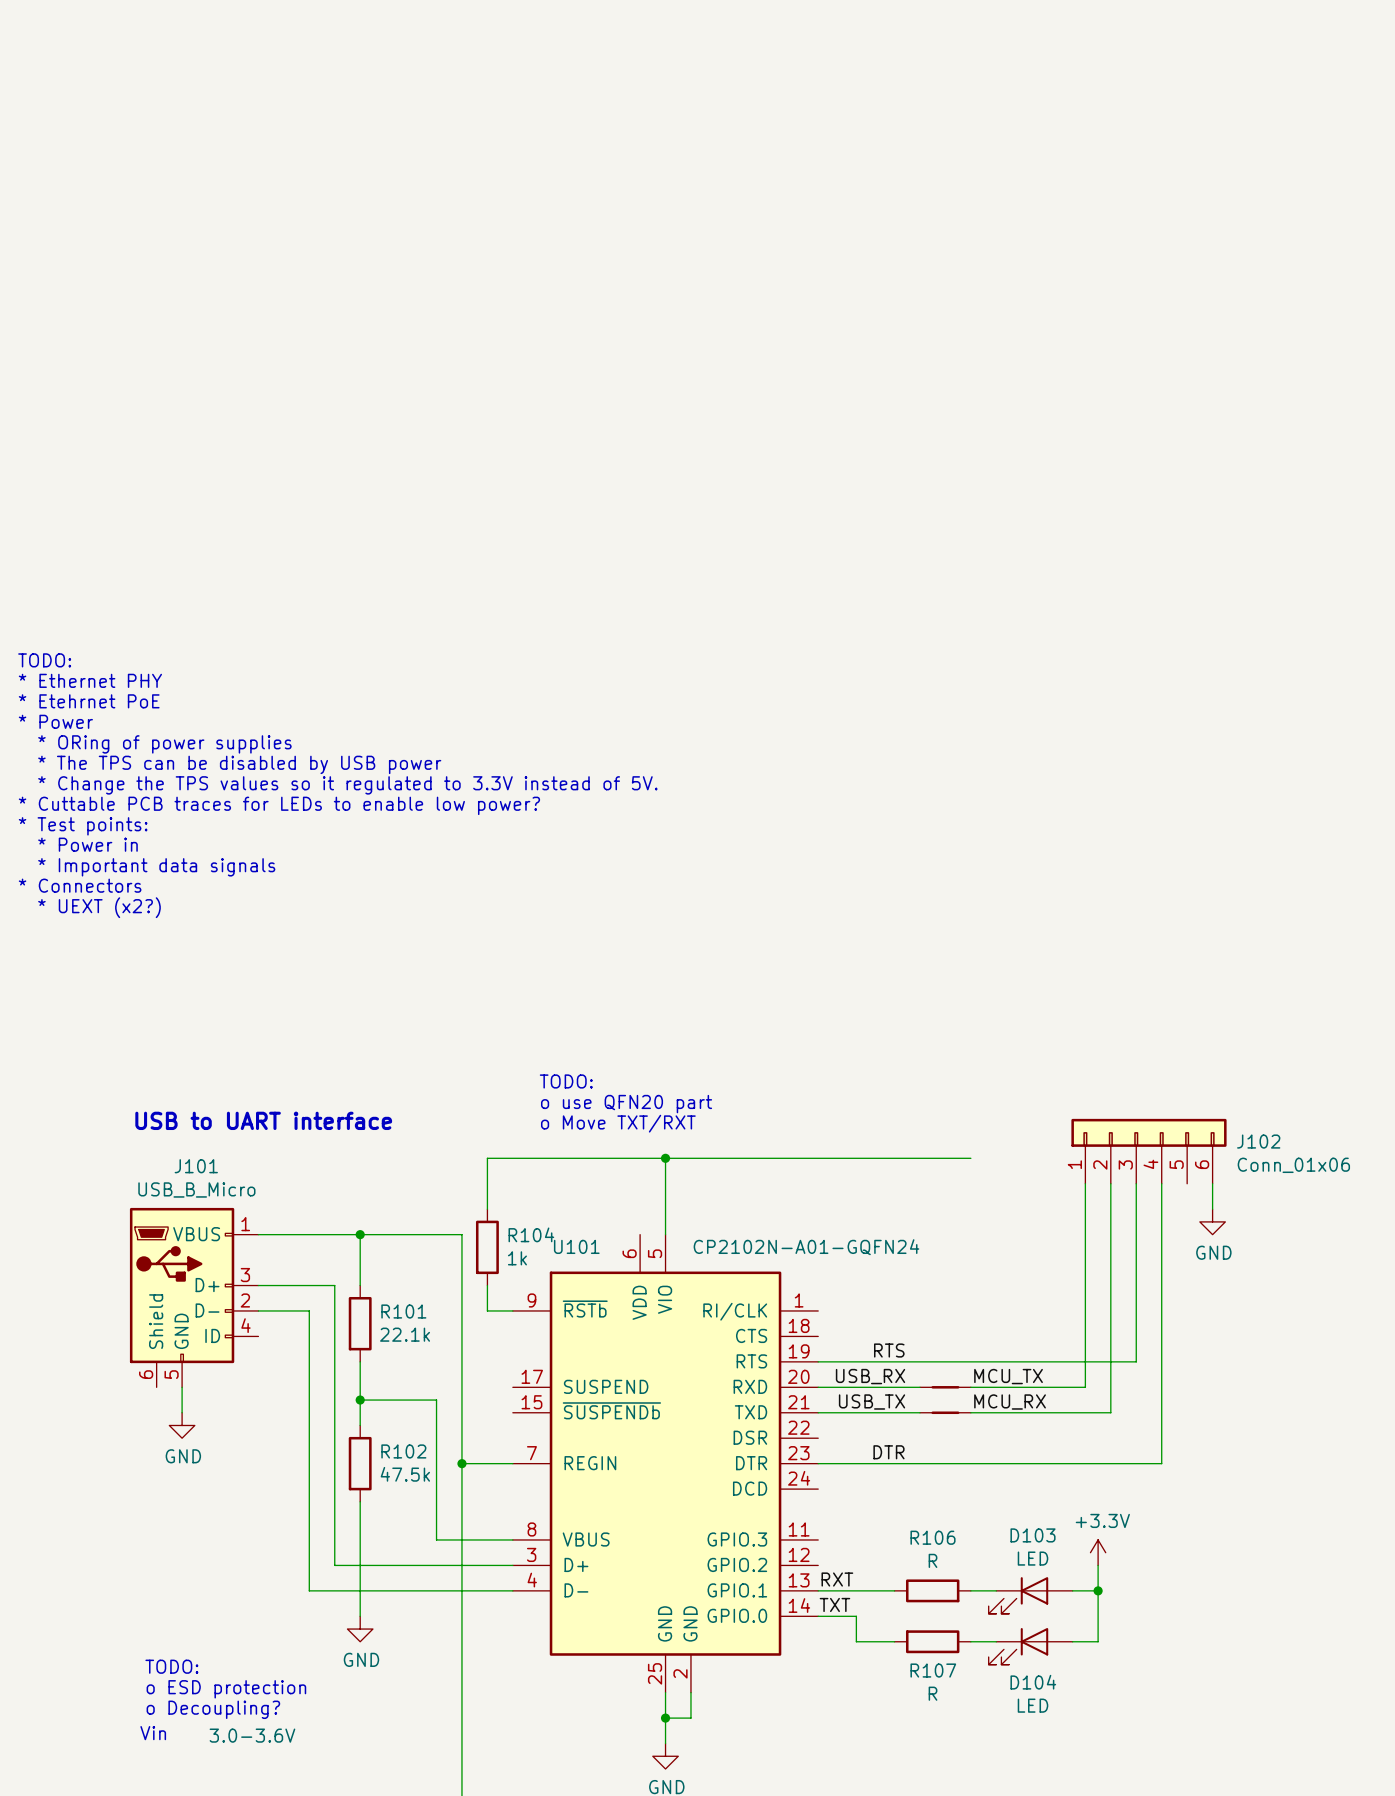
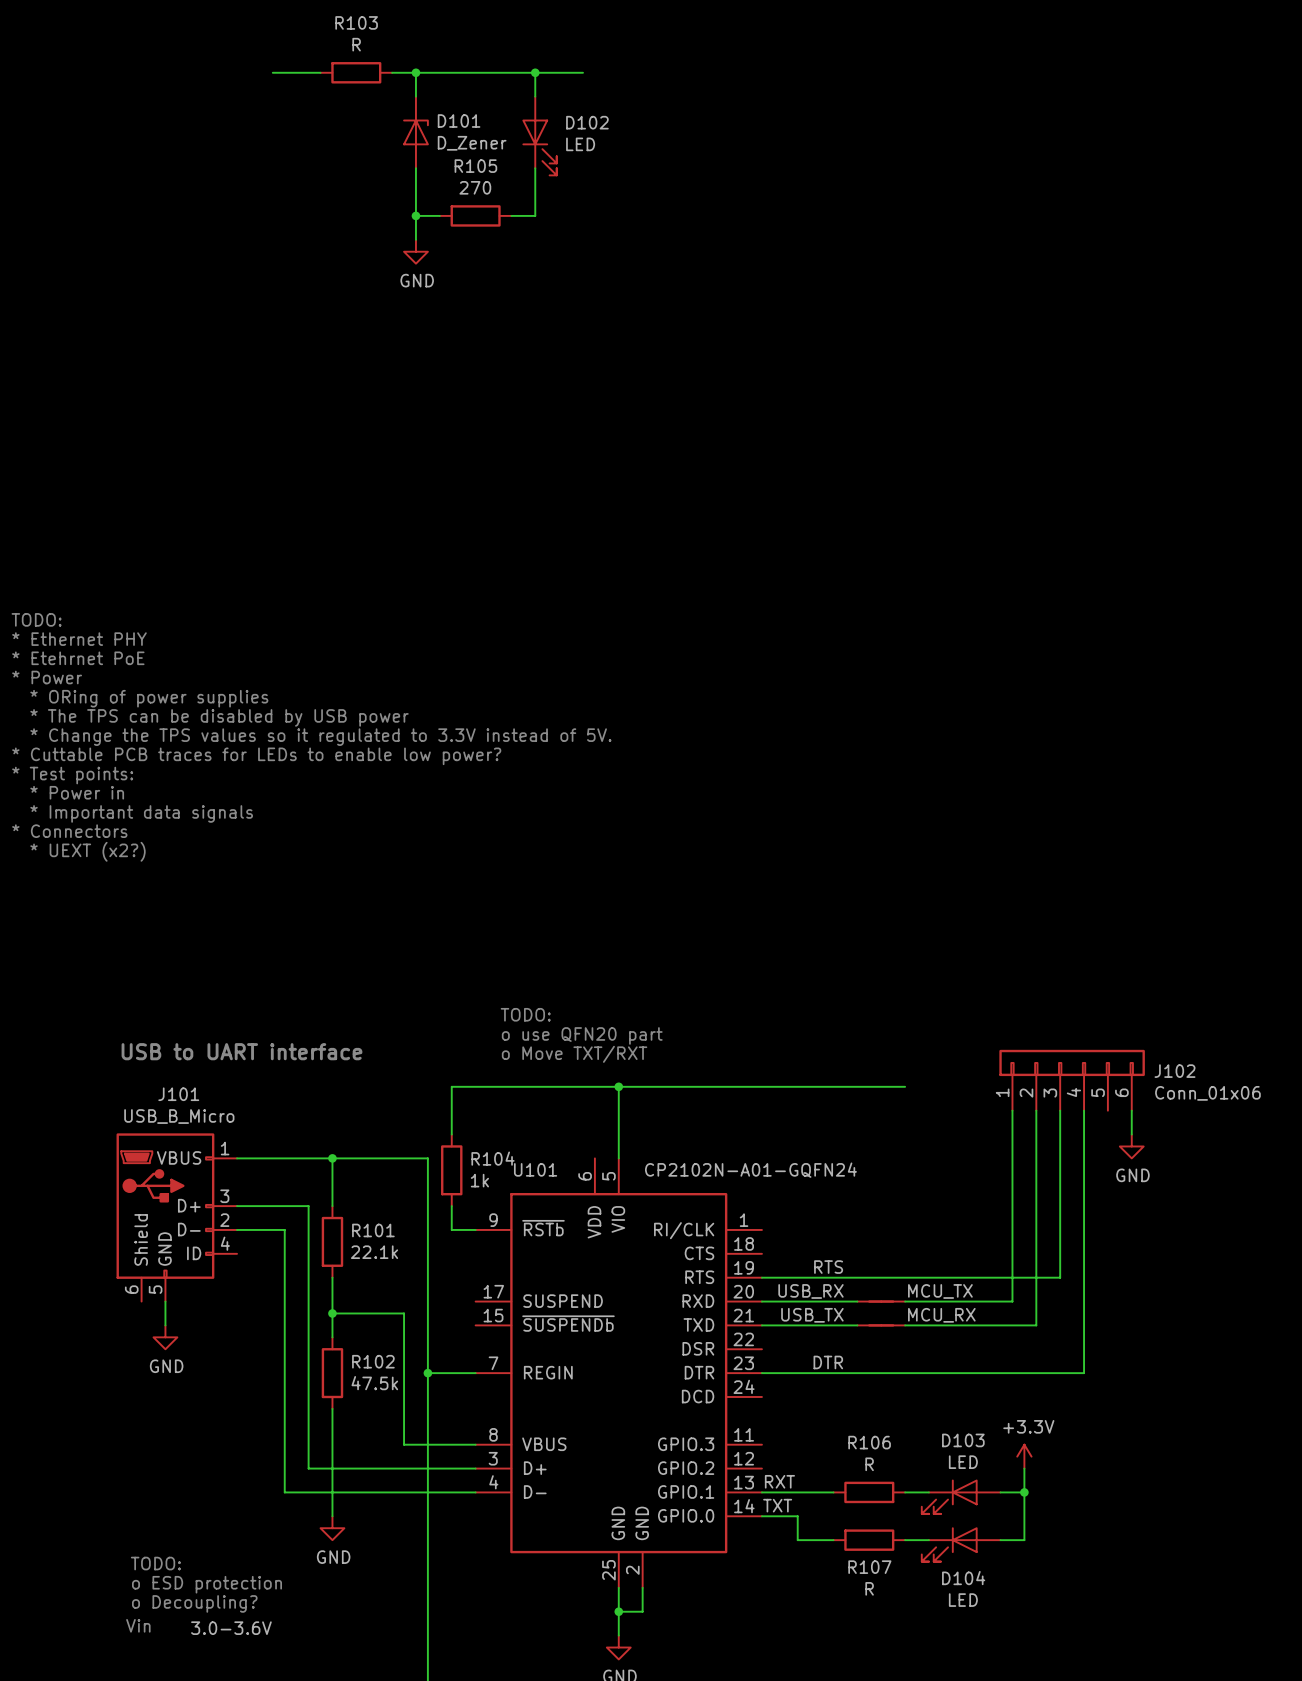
wire: none -> (272, 72) (320, 72)
R103: none -> R (356, 72)
wire: none -> (392, 72) (582, 72)
wire: none -> (415, 72) (415, 96)
junction: none -> (415, 72)
wire: none -> (535, 72) (535, 96)
junction: none -> (535, 72)
D101: none -> D_Zener (415, 132)
D102: none -> LED (539, 136)
wire: none -> (415, 168) (415, 239)
wire: none -> (535, 168) (535, 215) (511, 215)
wire: none -> (415, 215) (439, 215)
junction: none -> (415, 215)
R105: none -> 270 (475, 215)
power symbol: none -> GND (415, 251)

